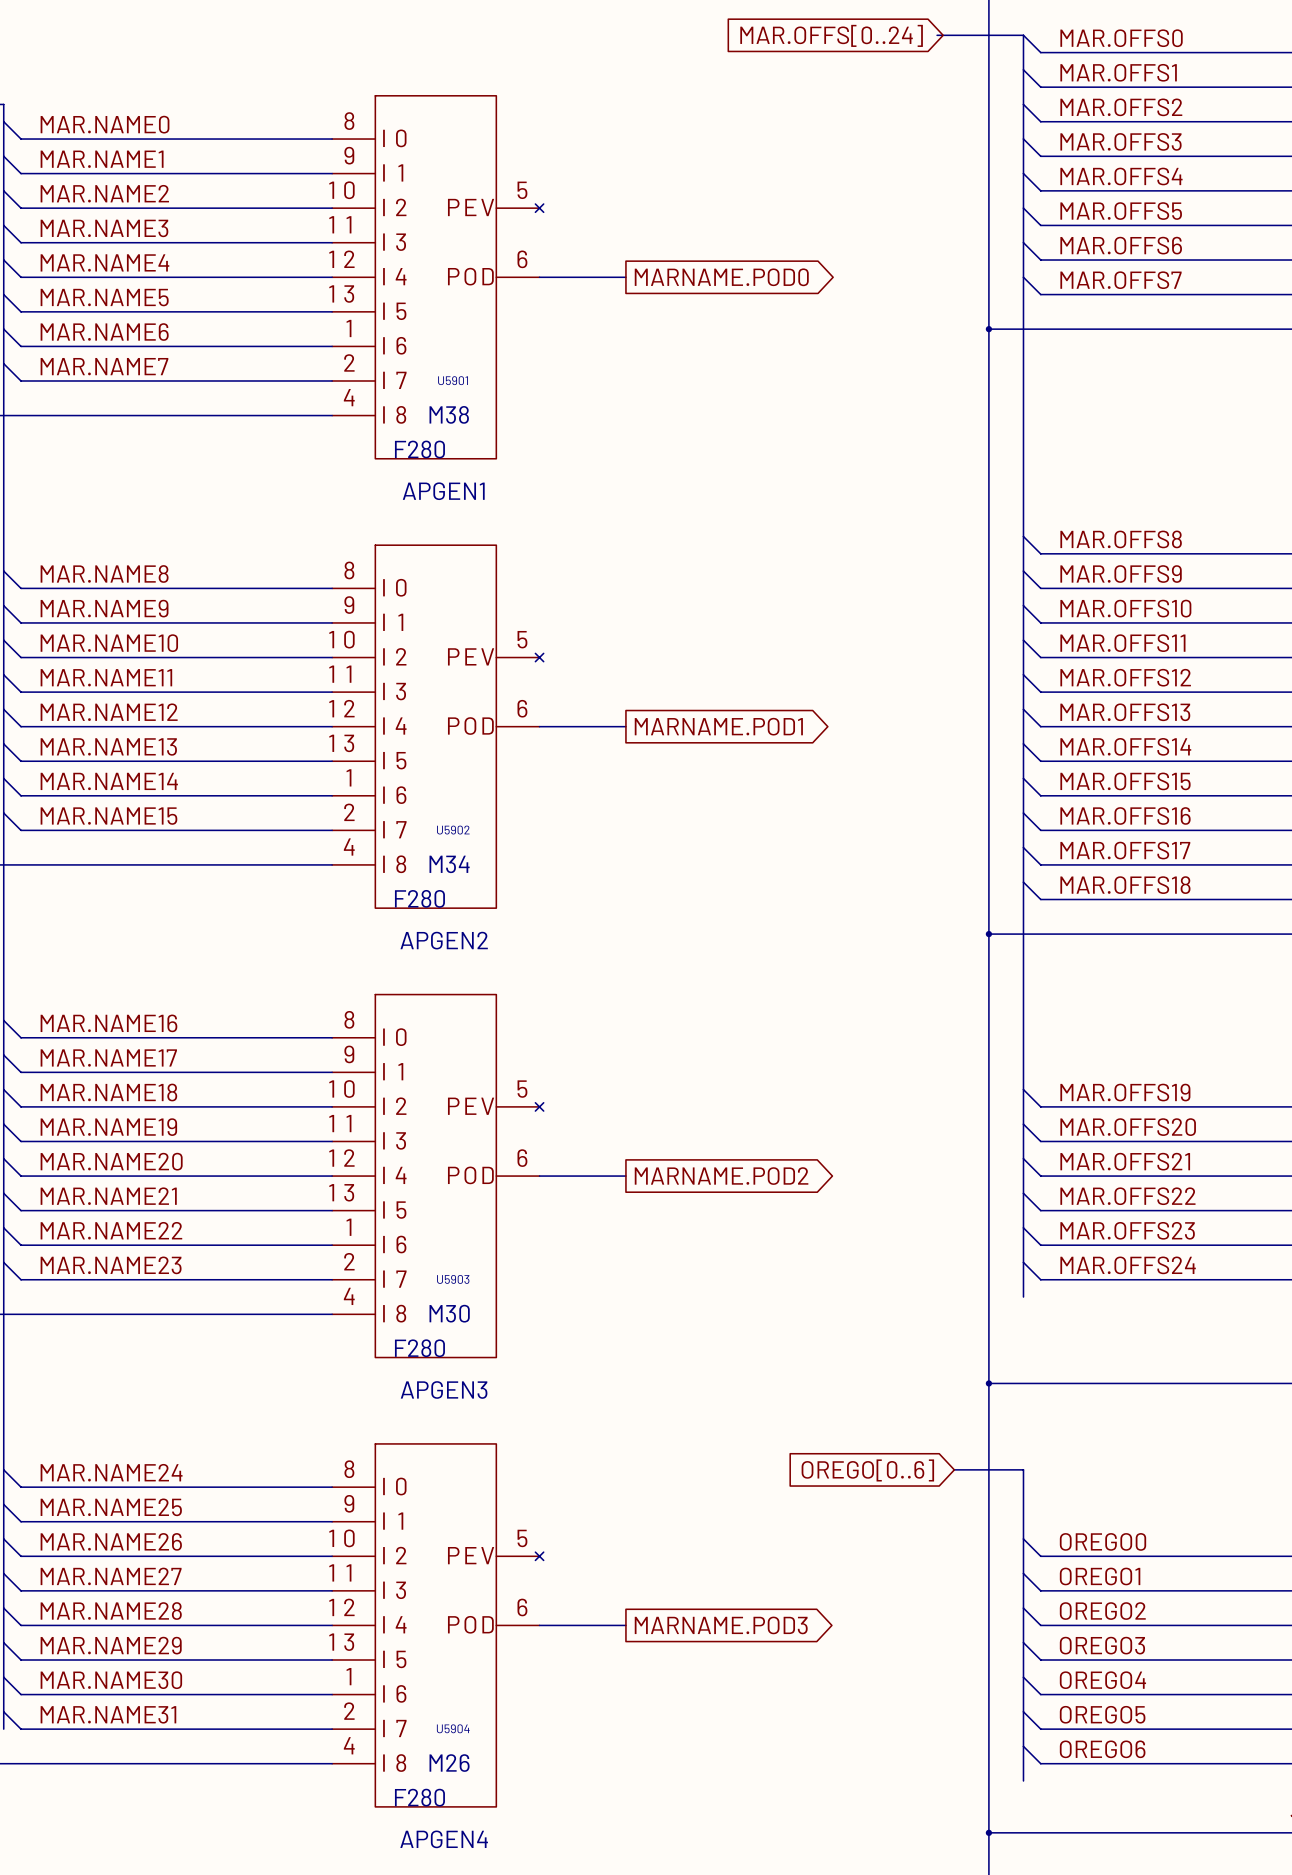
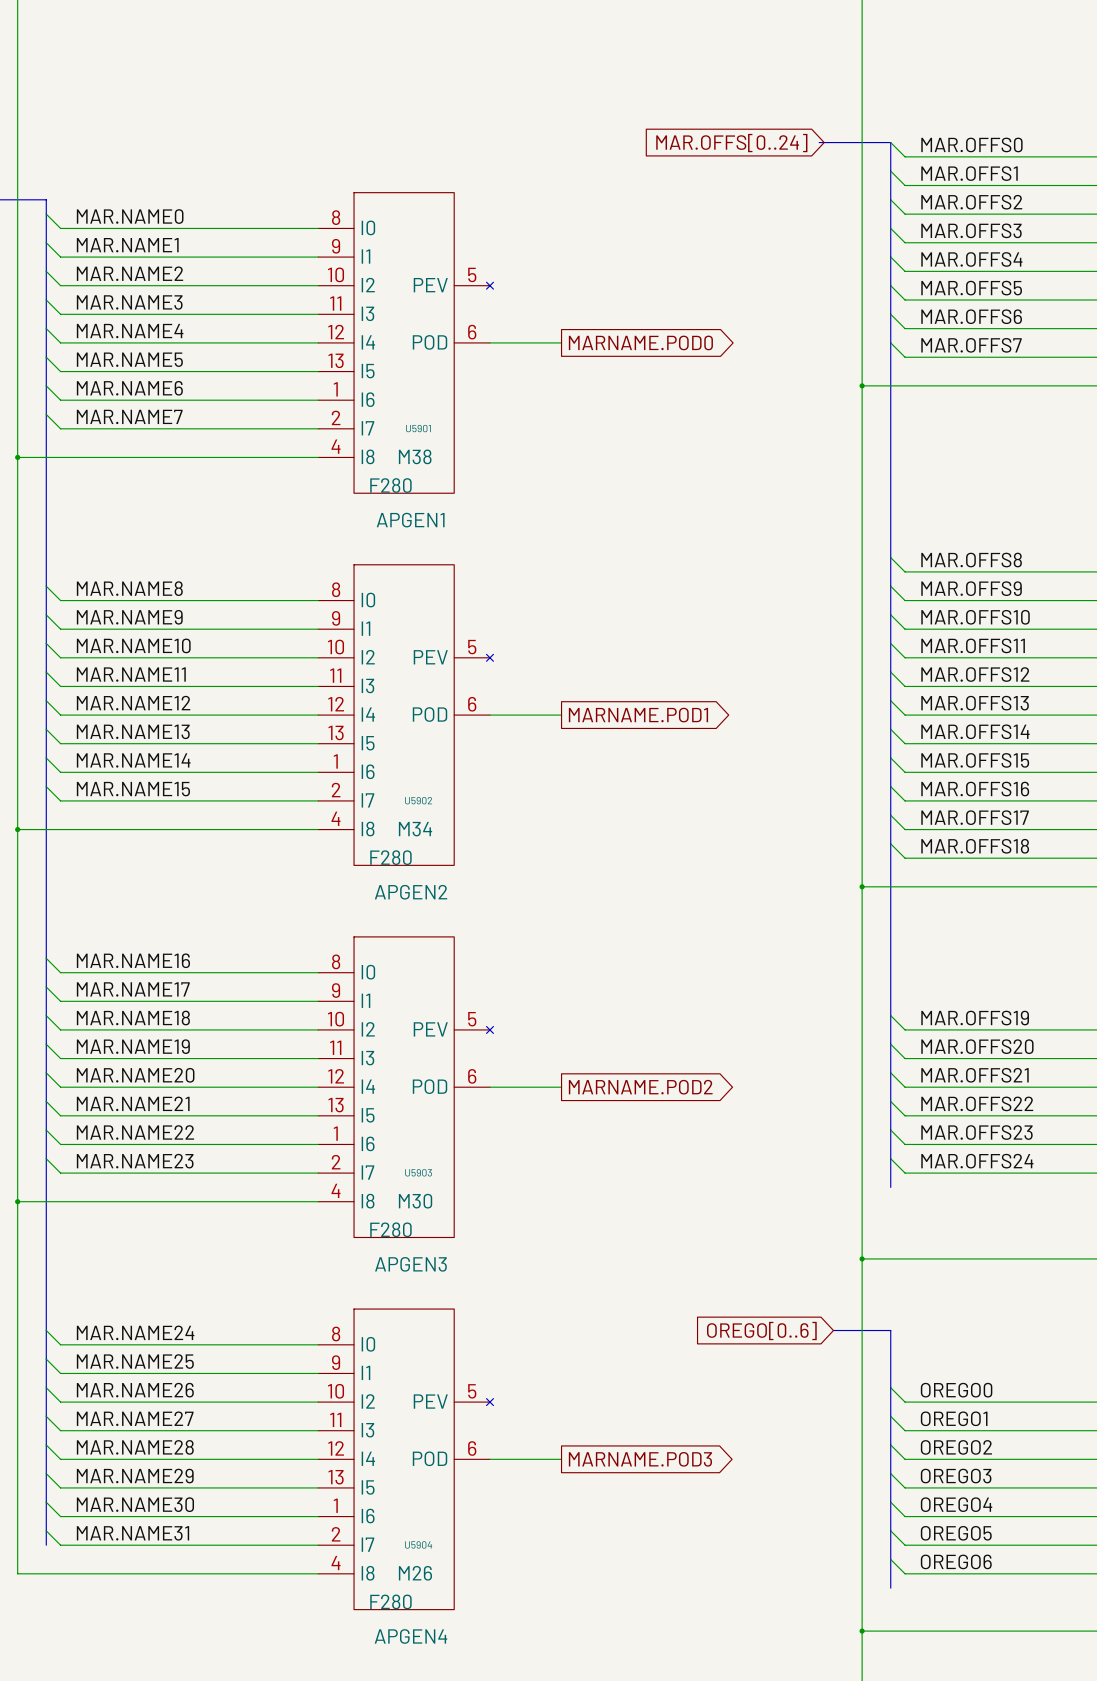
U5901 symbol: [332, 95, 540, 459] -> [318, 192, 490, 494]
U5902 symbol: [332, 545, 540, 909] -> [318, 564, 490, 866]
U5903 symbol: [332, 994, 540, 1358] -> [318, 936, 490, 1238]
U5904 symbol: [332, 1443, 540, 1807] -> [318, 1309, 490, 1610]

